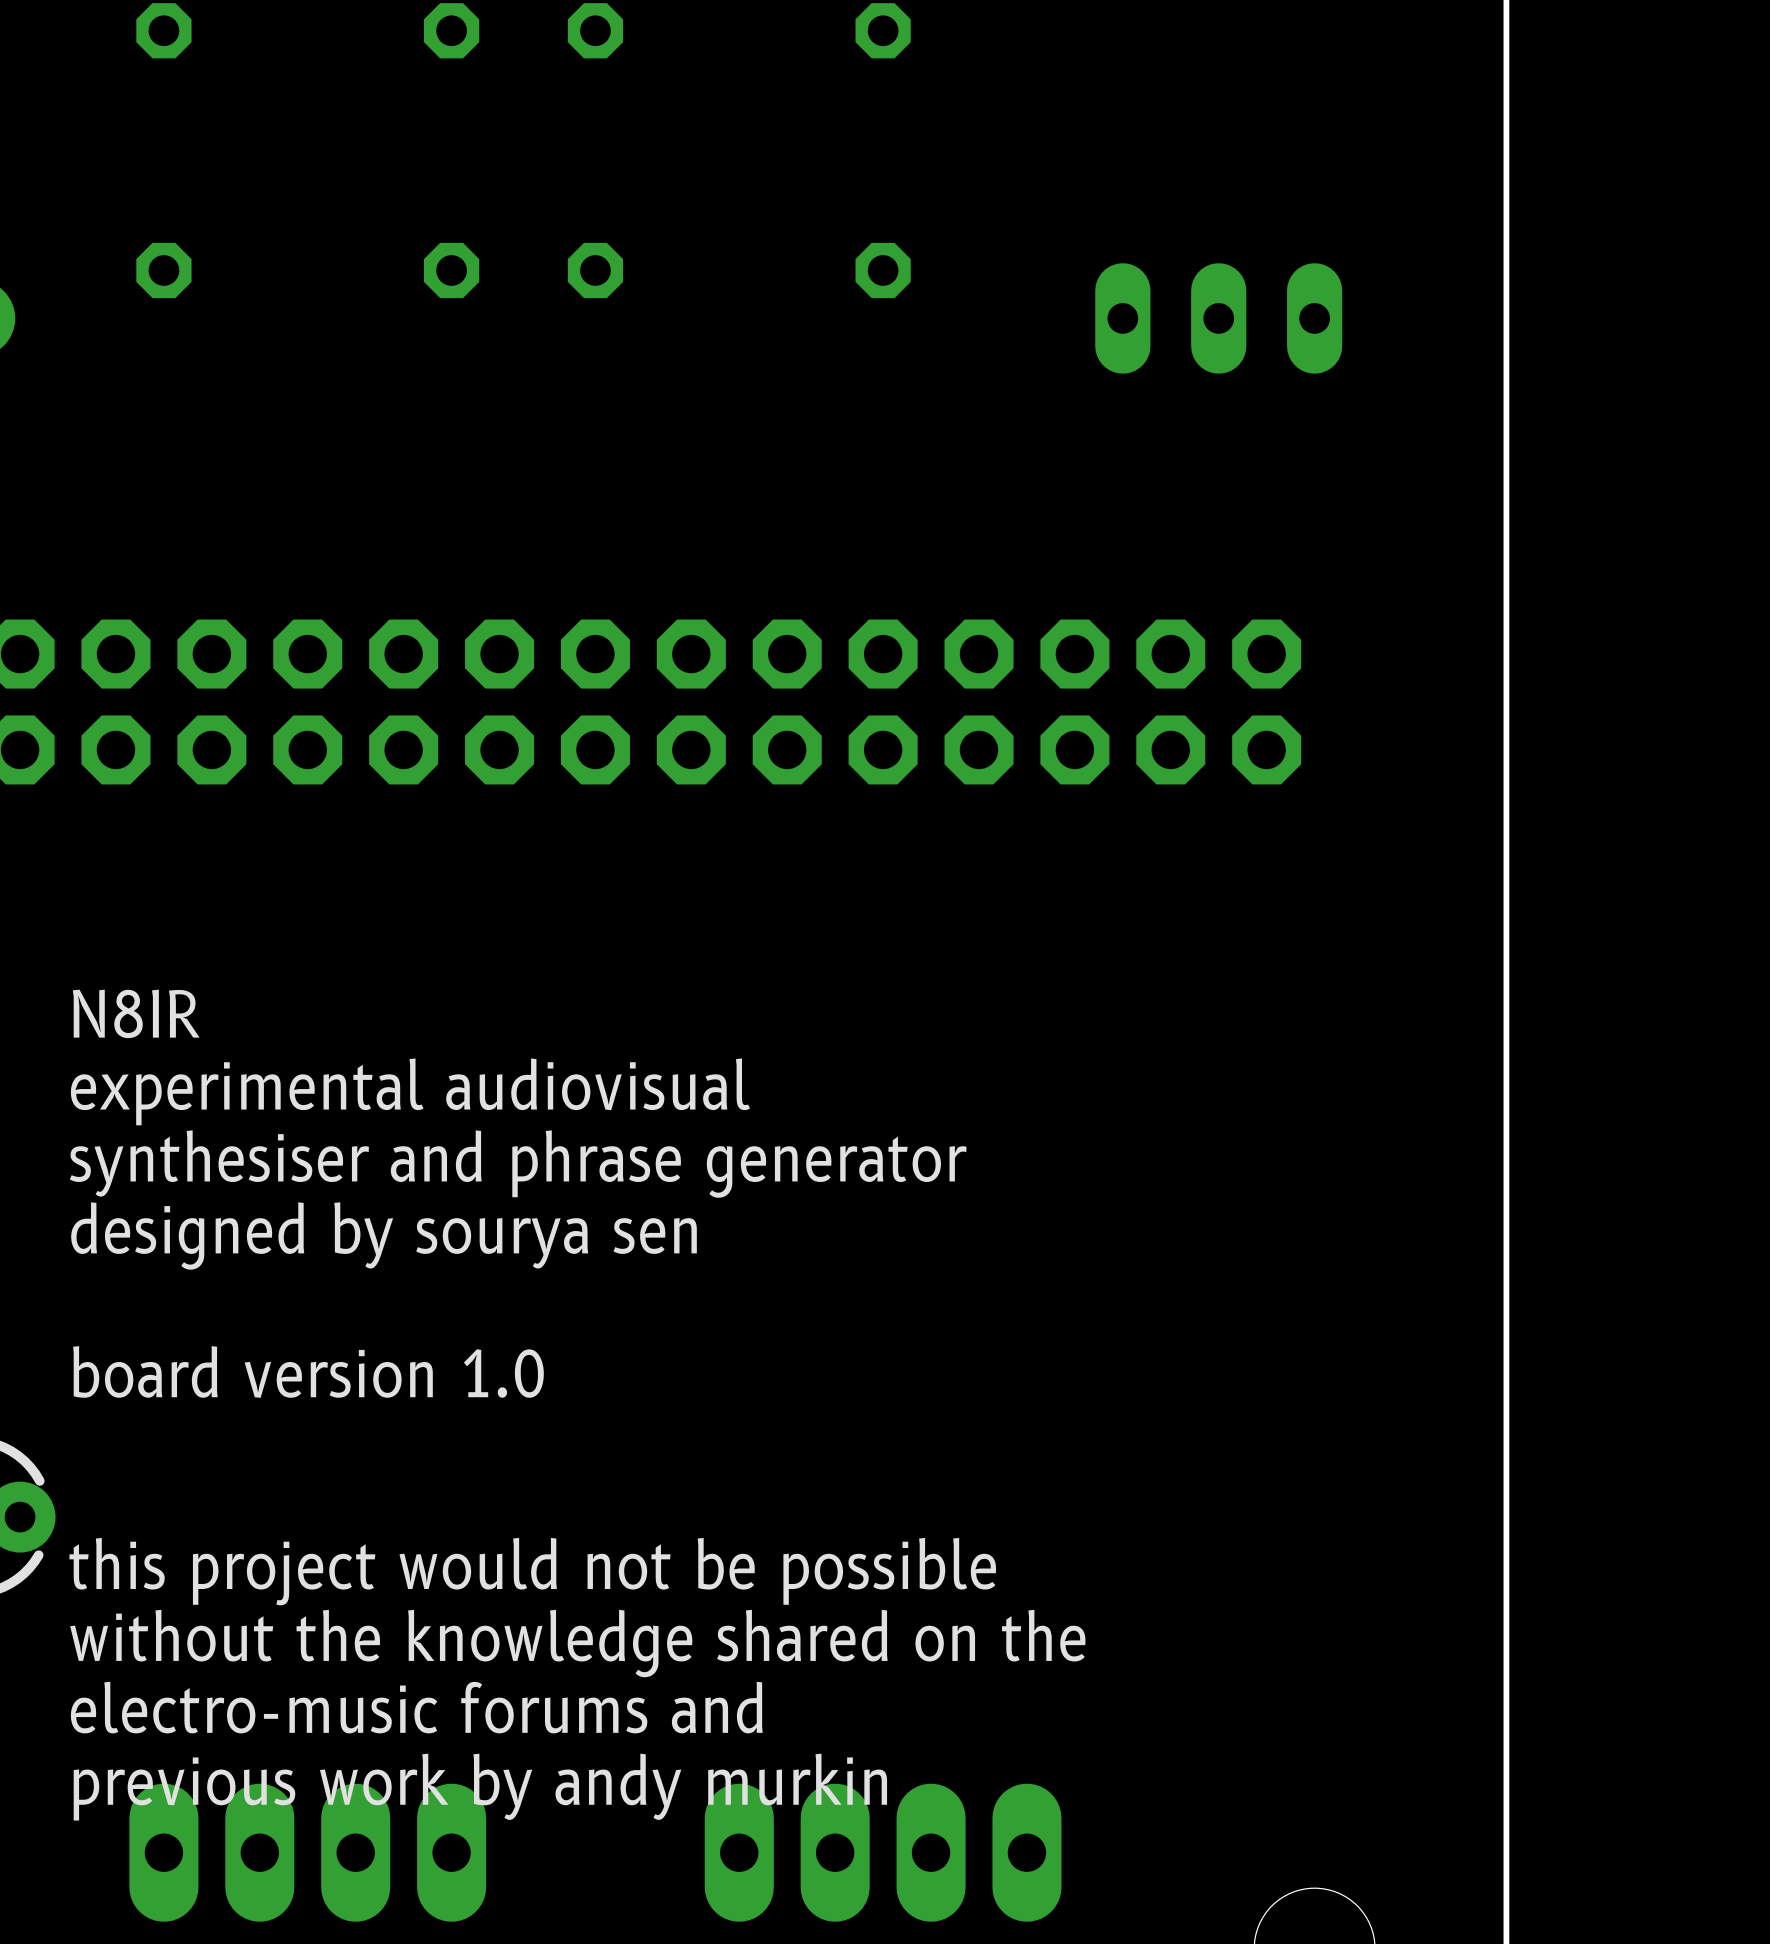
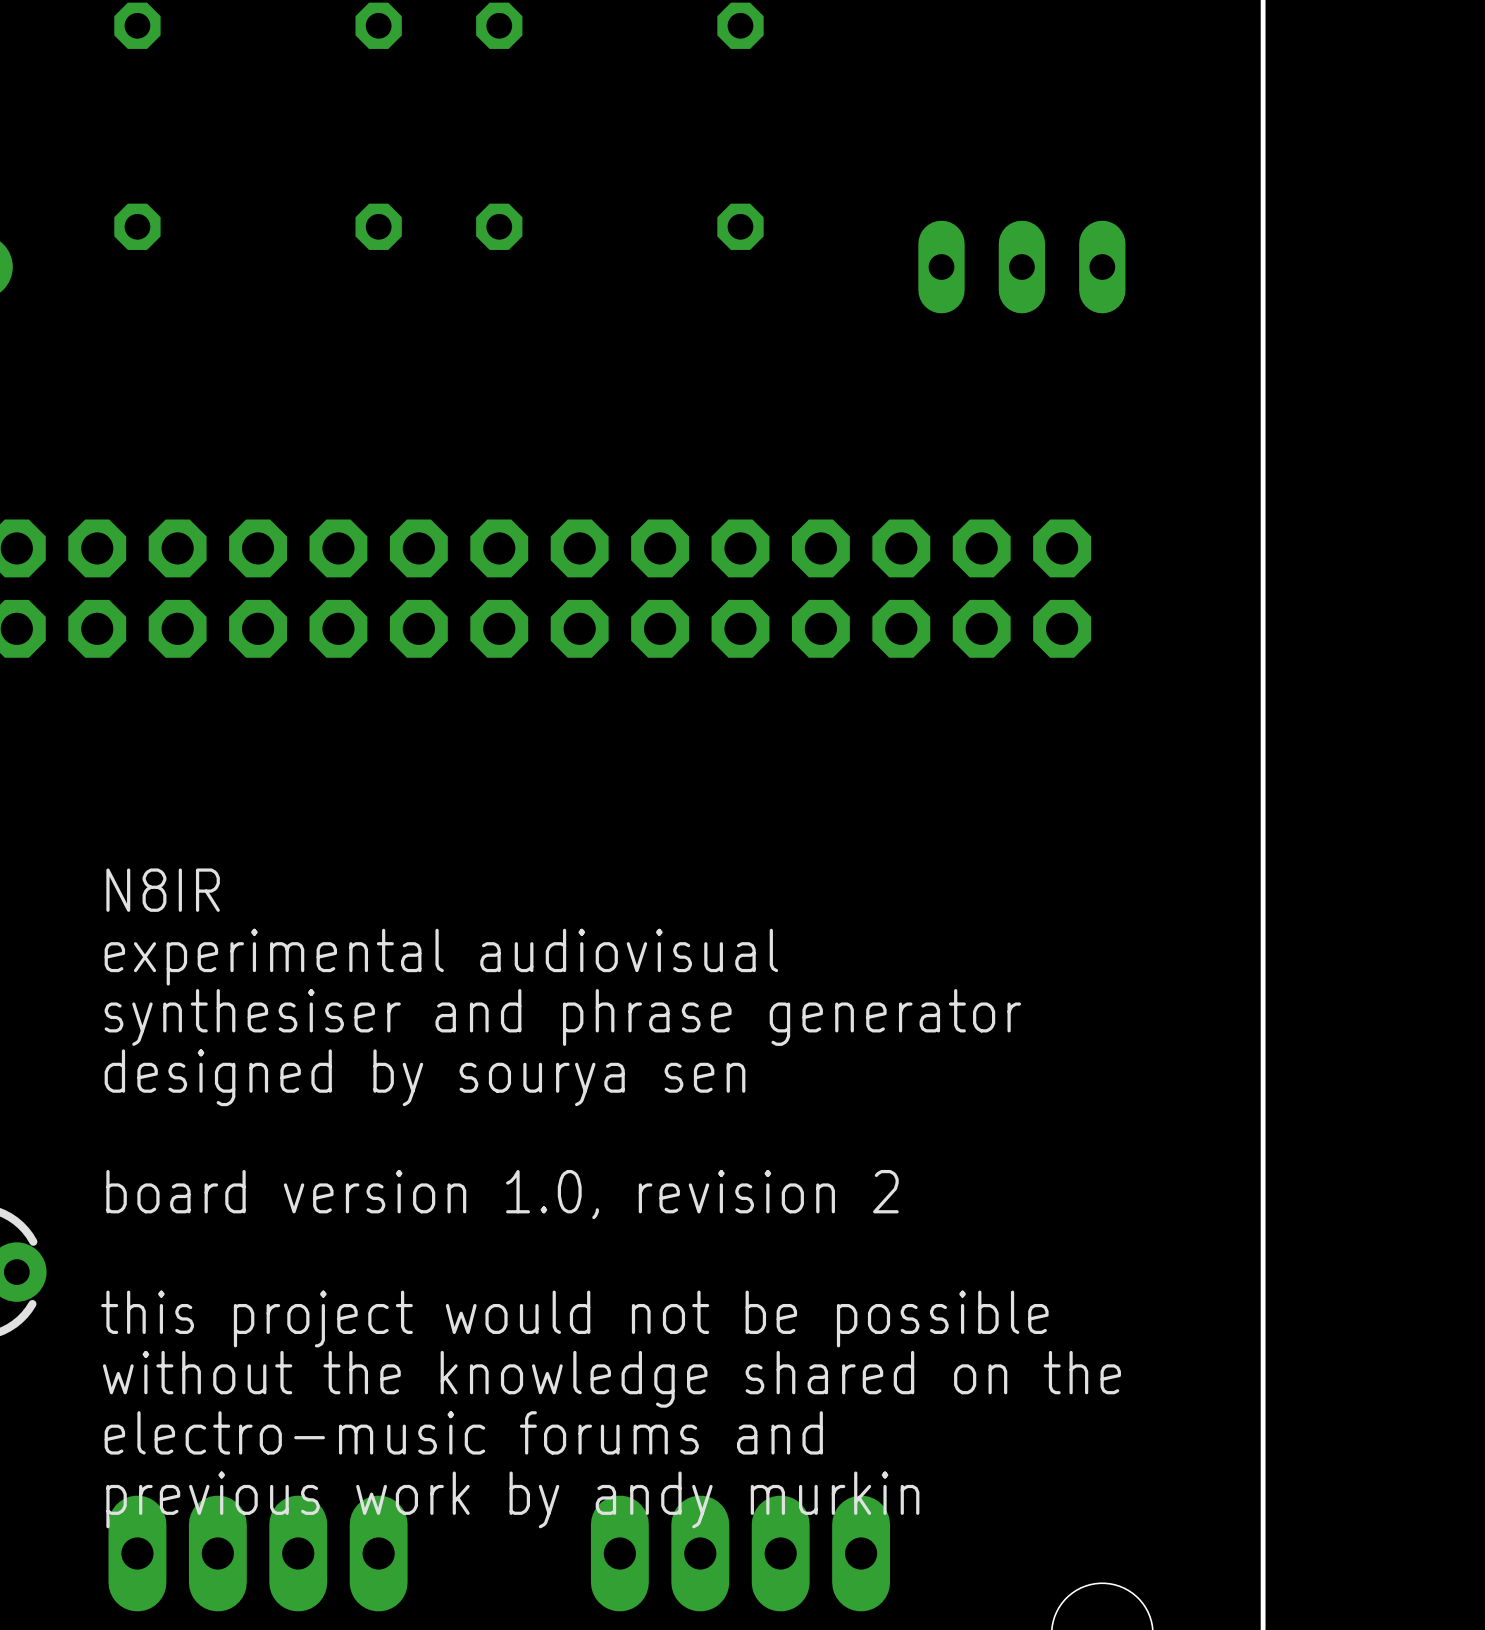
text position: N8IR (136, 1013) -> N8IR (163, 890)
text position: experimental audiovisual (410, 1091) -> experimental audiovisual (441, 957)
text position: synthesiser and phrase generator (518, 1164) -> synthesiser and phrase generator (562, 1017)
text position: designed by sourya sen (384, 1235) -> designed by sourya sen (425, 1077)
text: board version 1.0 (308, 1371) -> board version 1.0, revision 2 (502, 1194)
text position: this project would not be possible (532, 1571) -> this project would not be possible (574, 1318)
text position: without the knowledge shared on the (577, 1643) -> without the knowledge shared on the (611, 1379)
text position: electro-music forums and (416, 1707) -> electro-music forums and (463, 1432)
text position: previous work by andy murkin (480, 1787) -> previous work by andy murkin (512, 1499)

